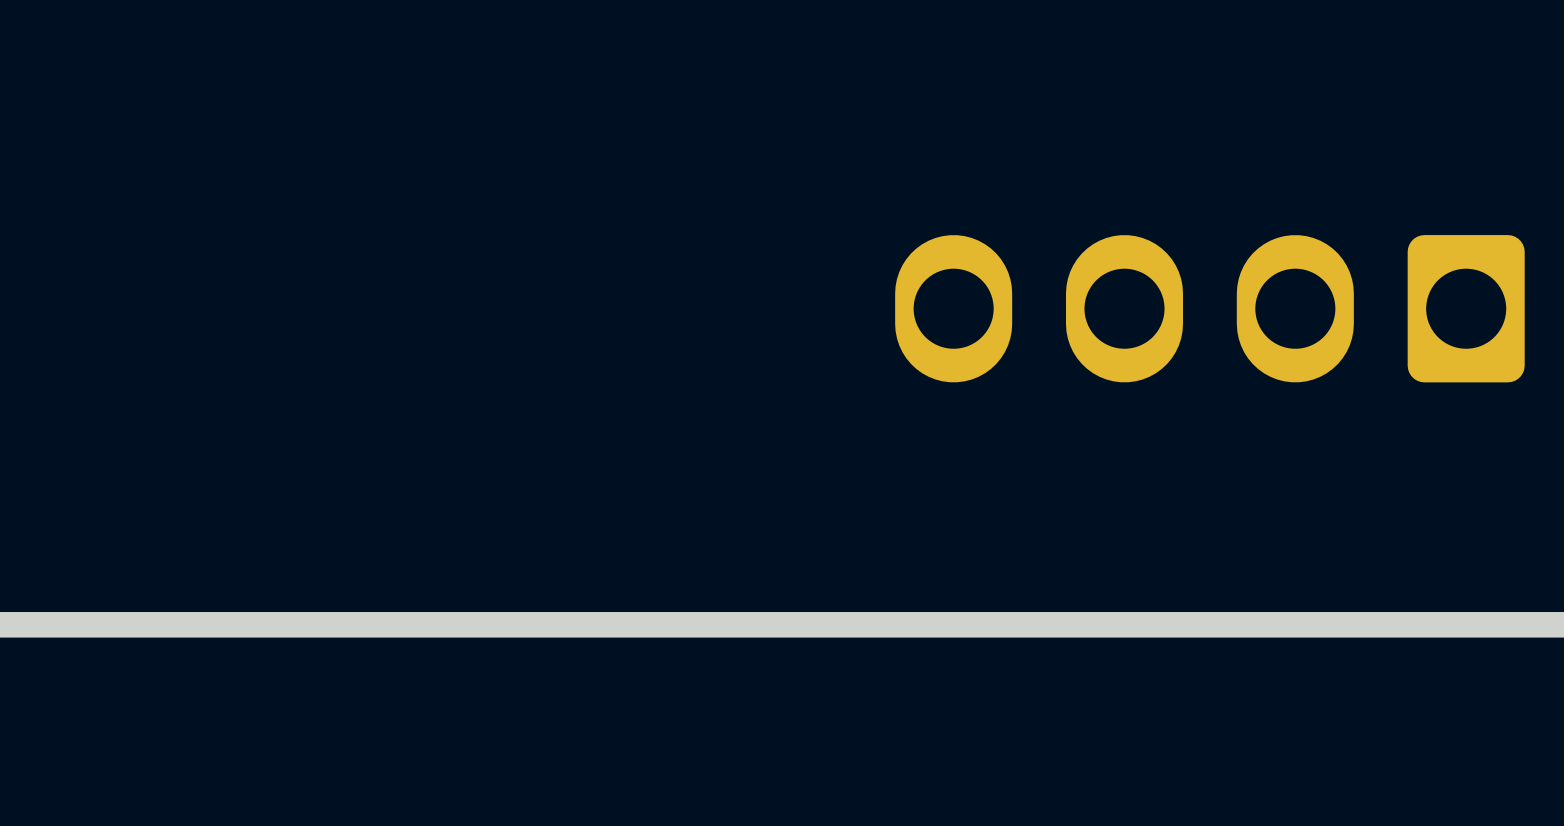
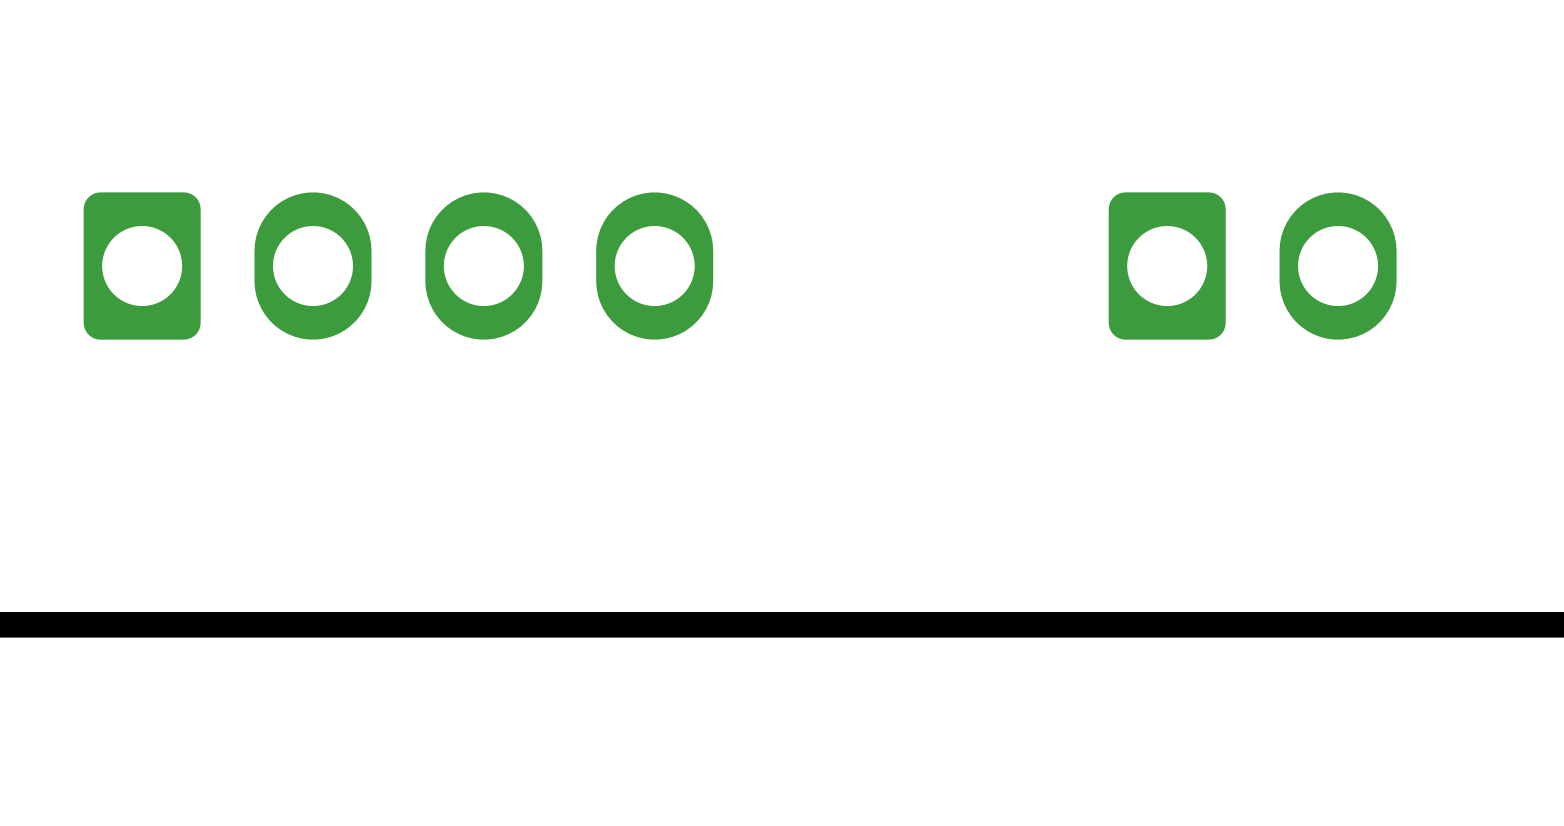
part footprint: [895, 235, 1525, 383] -> [1108, 192, 1397, 340]
part: none -> (398, 266)

